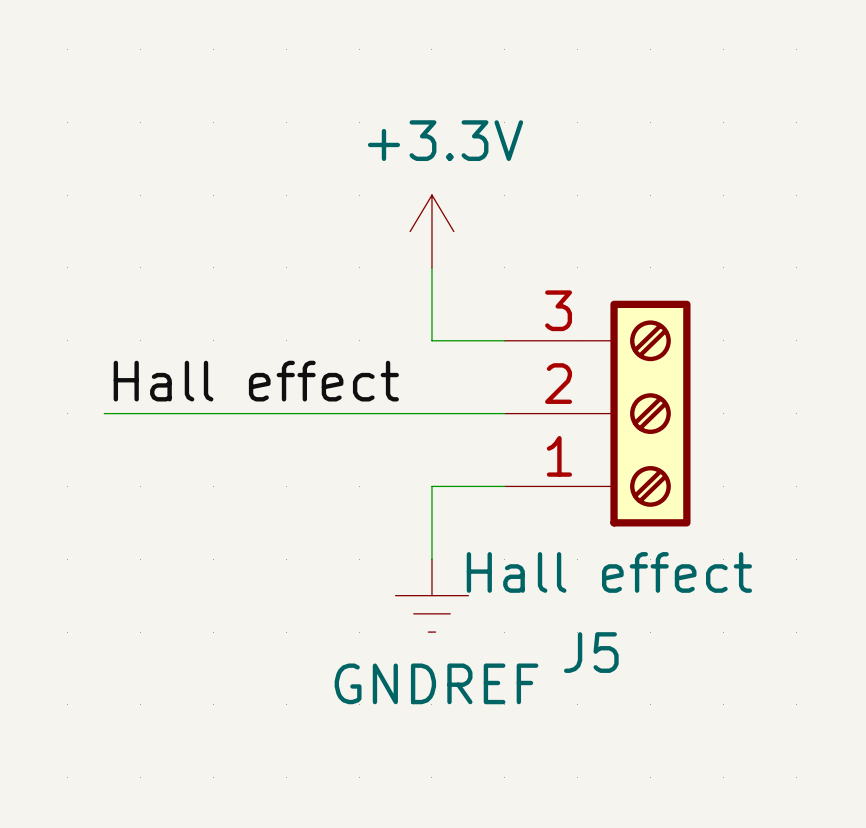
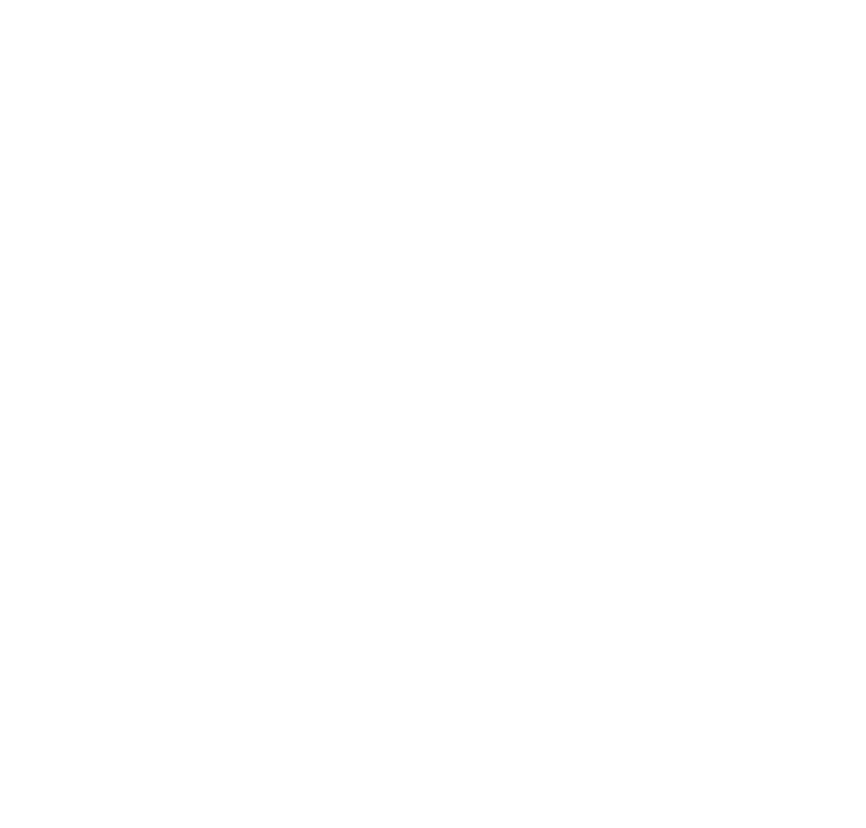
power symbol: +3.3V (431, 231) -> none
wire: (431, 267) (431, 340) (504, 340) -> none
label: Hall effect (256, 381) -> none
wire: (104, 413) (504, 413) -> none
J5: Hall effect (597, 413) -> none
wire: (504, 486) (431, 486) (431, 559) -> none
power symbol: GNDREF (431, 595) -> none

